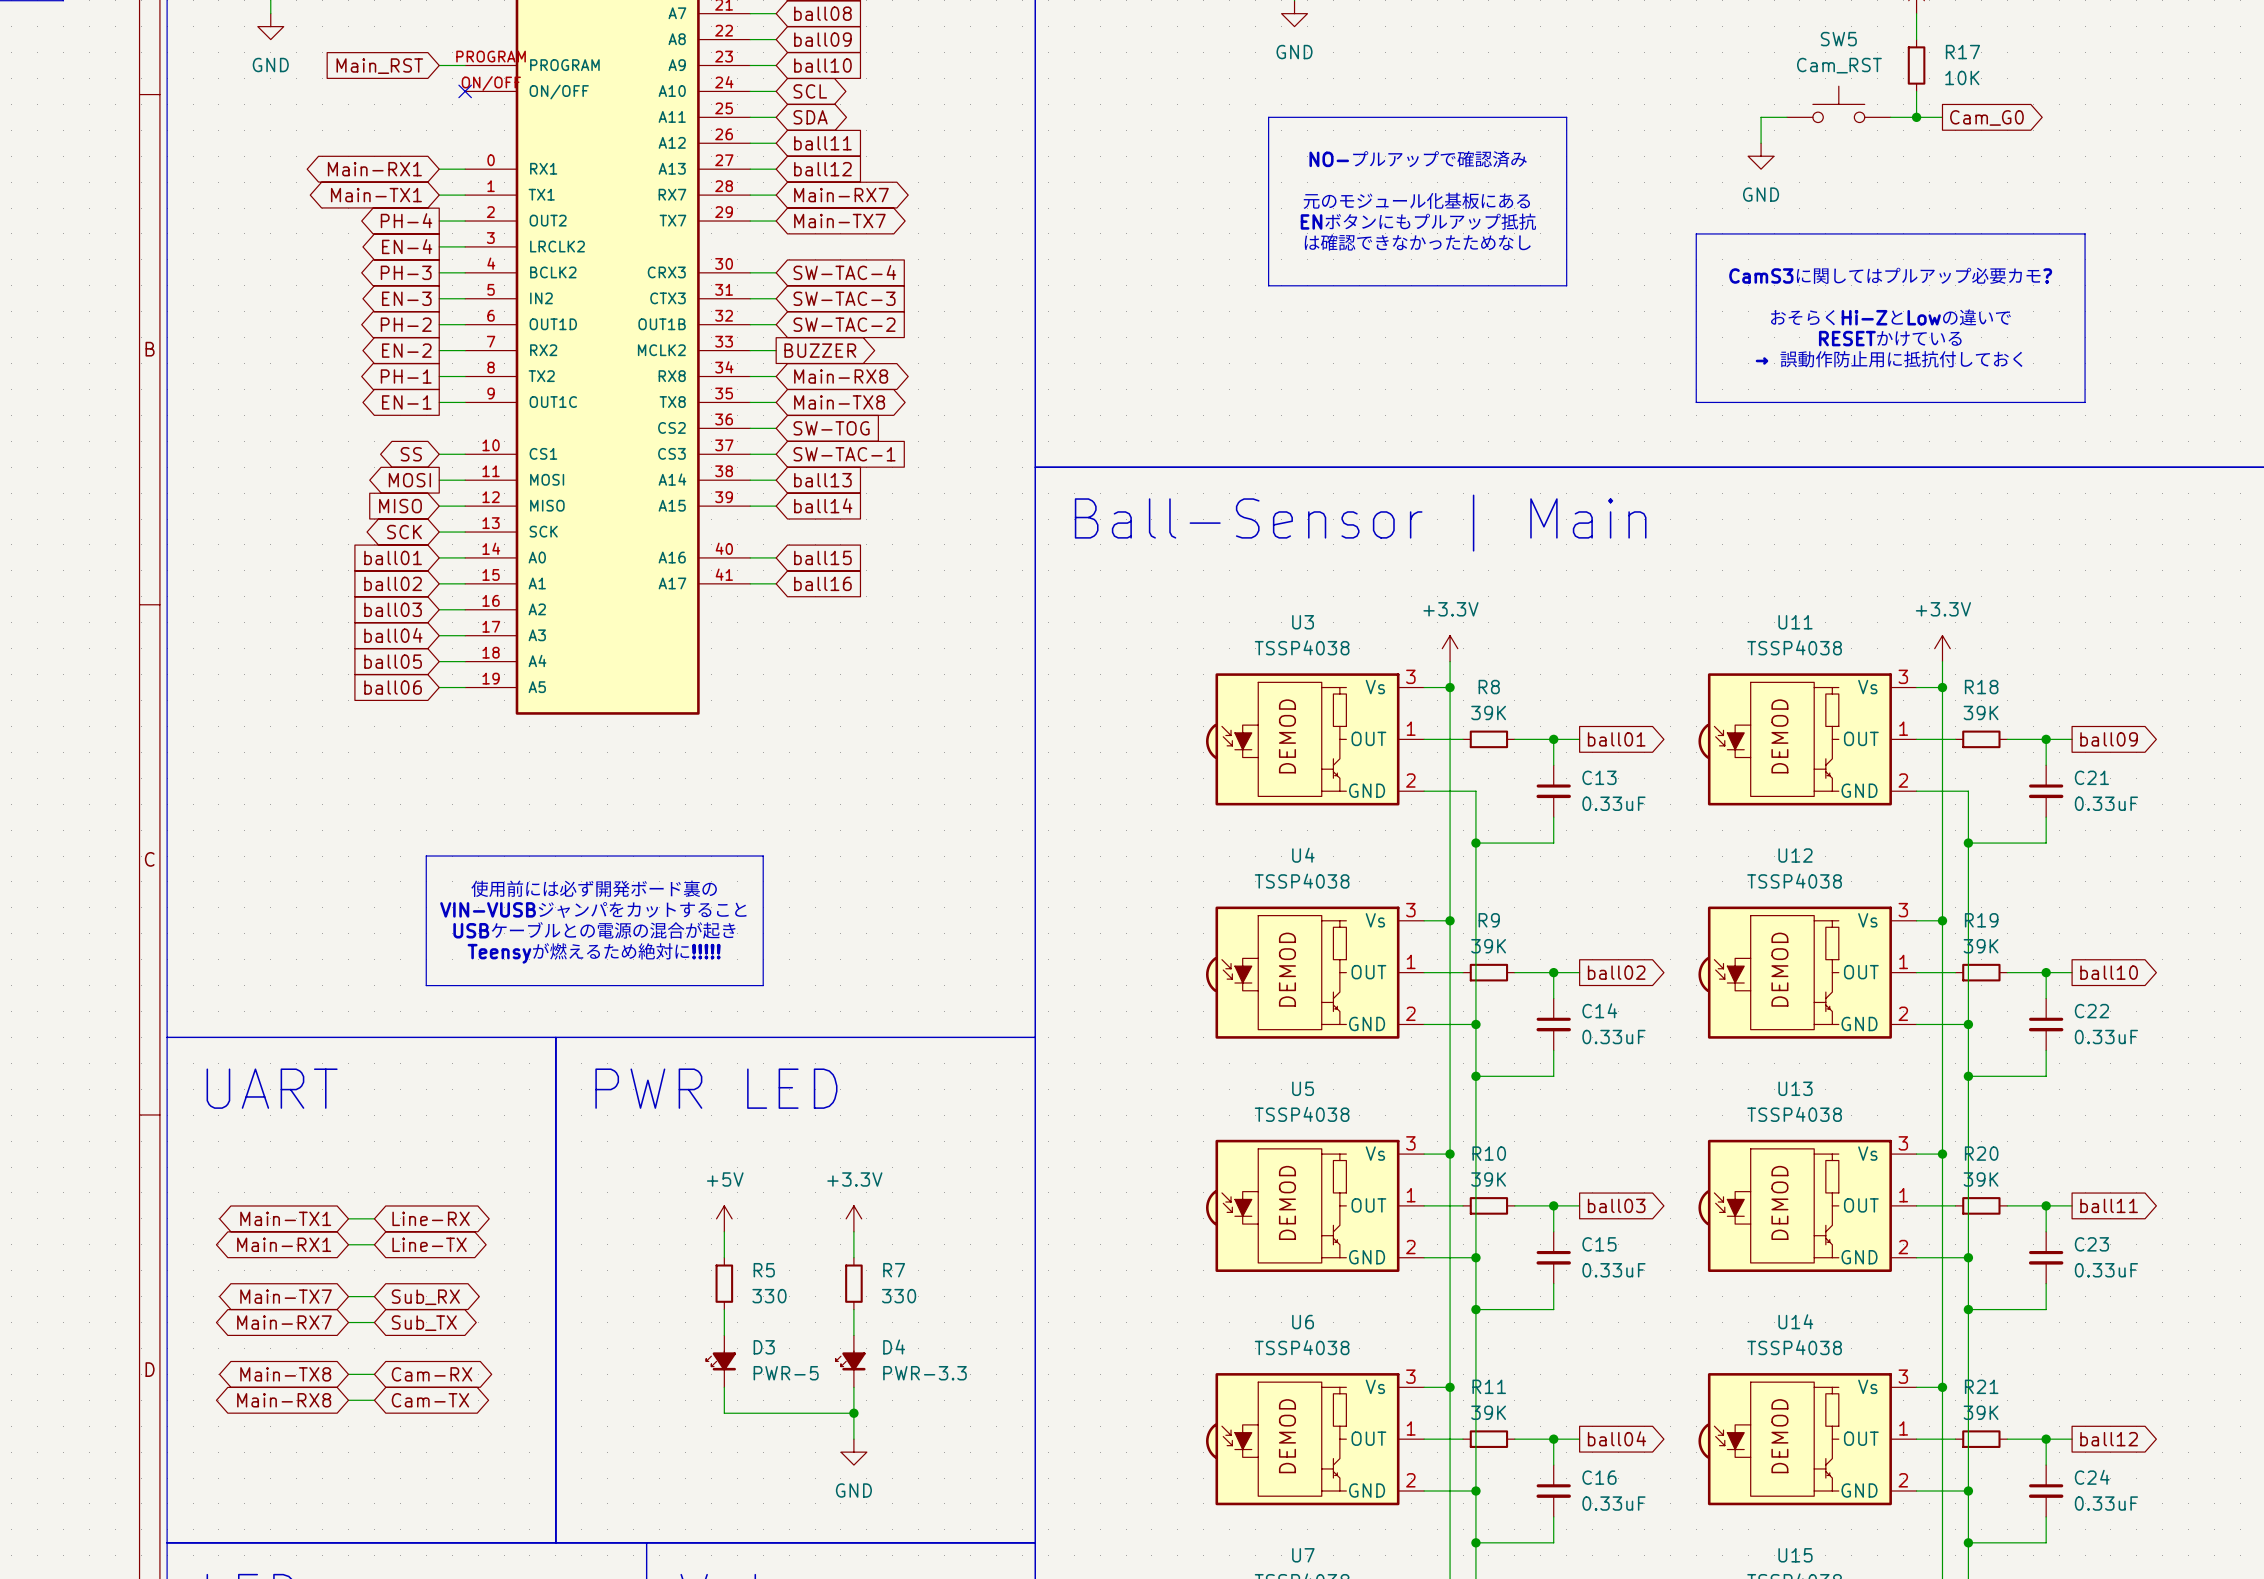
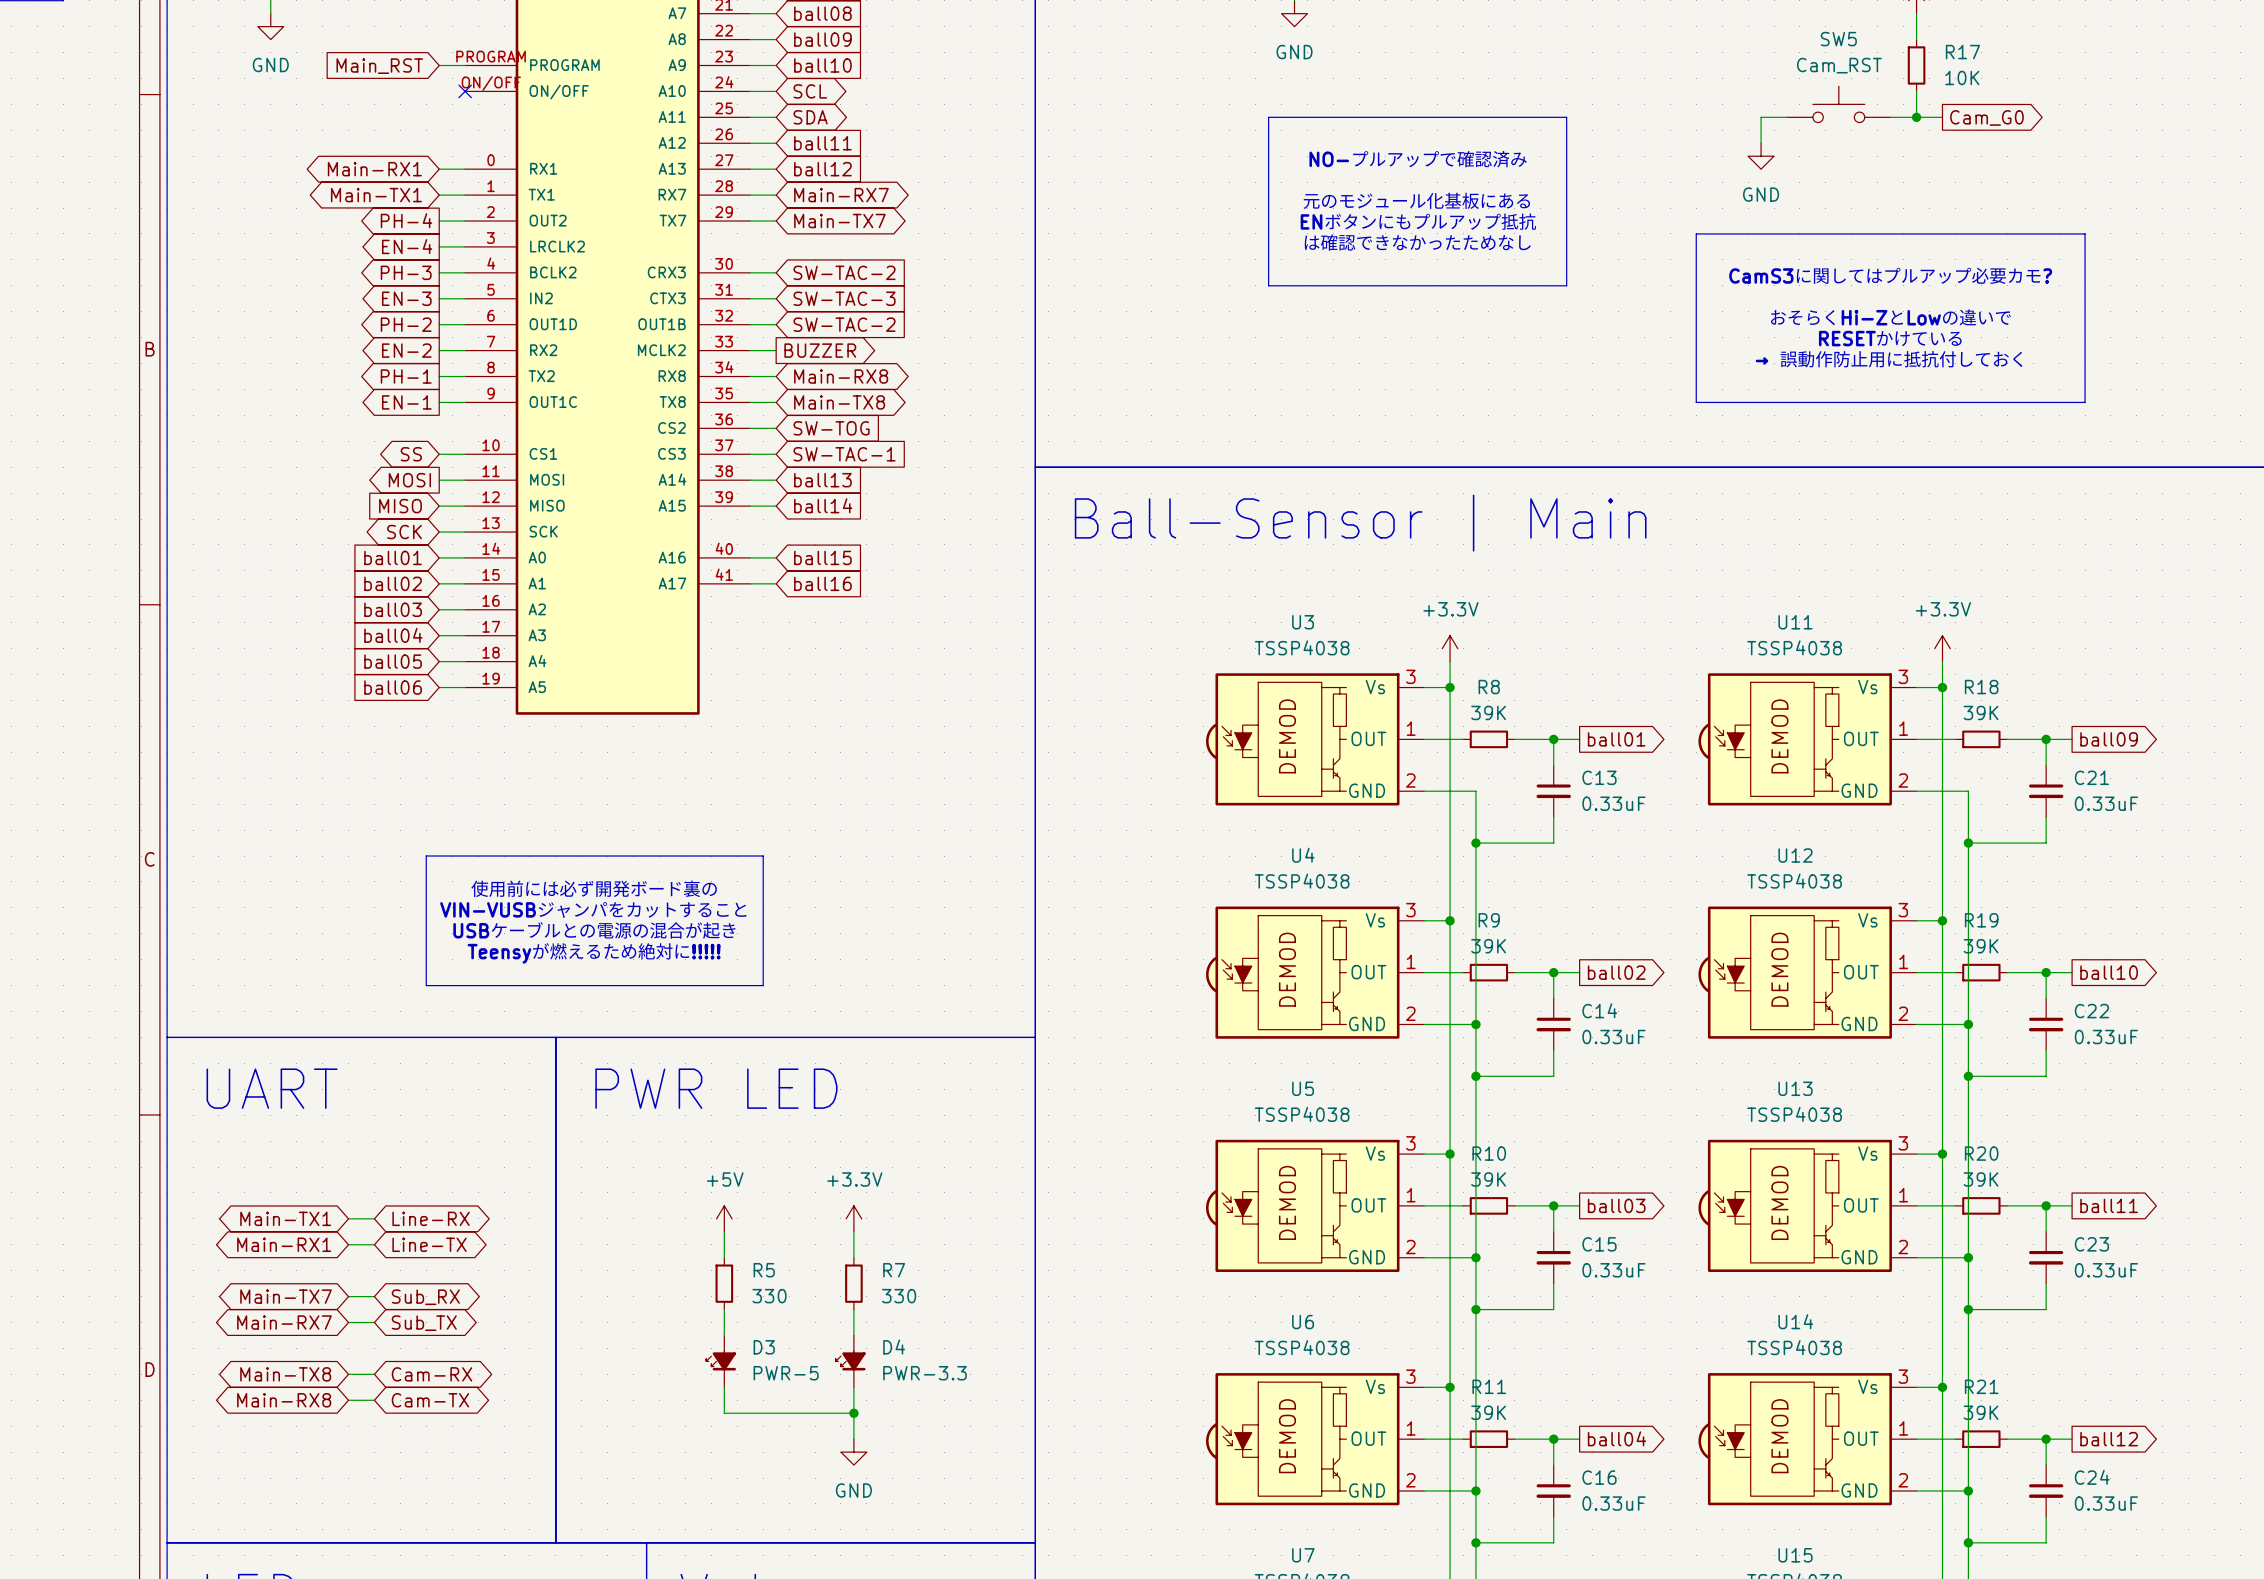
global label: SW-TAC-4 (844, 272) -> SW-TAC-2 (844, 272)

